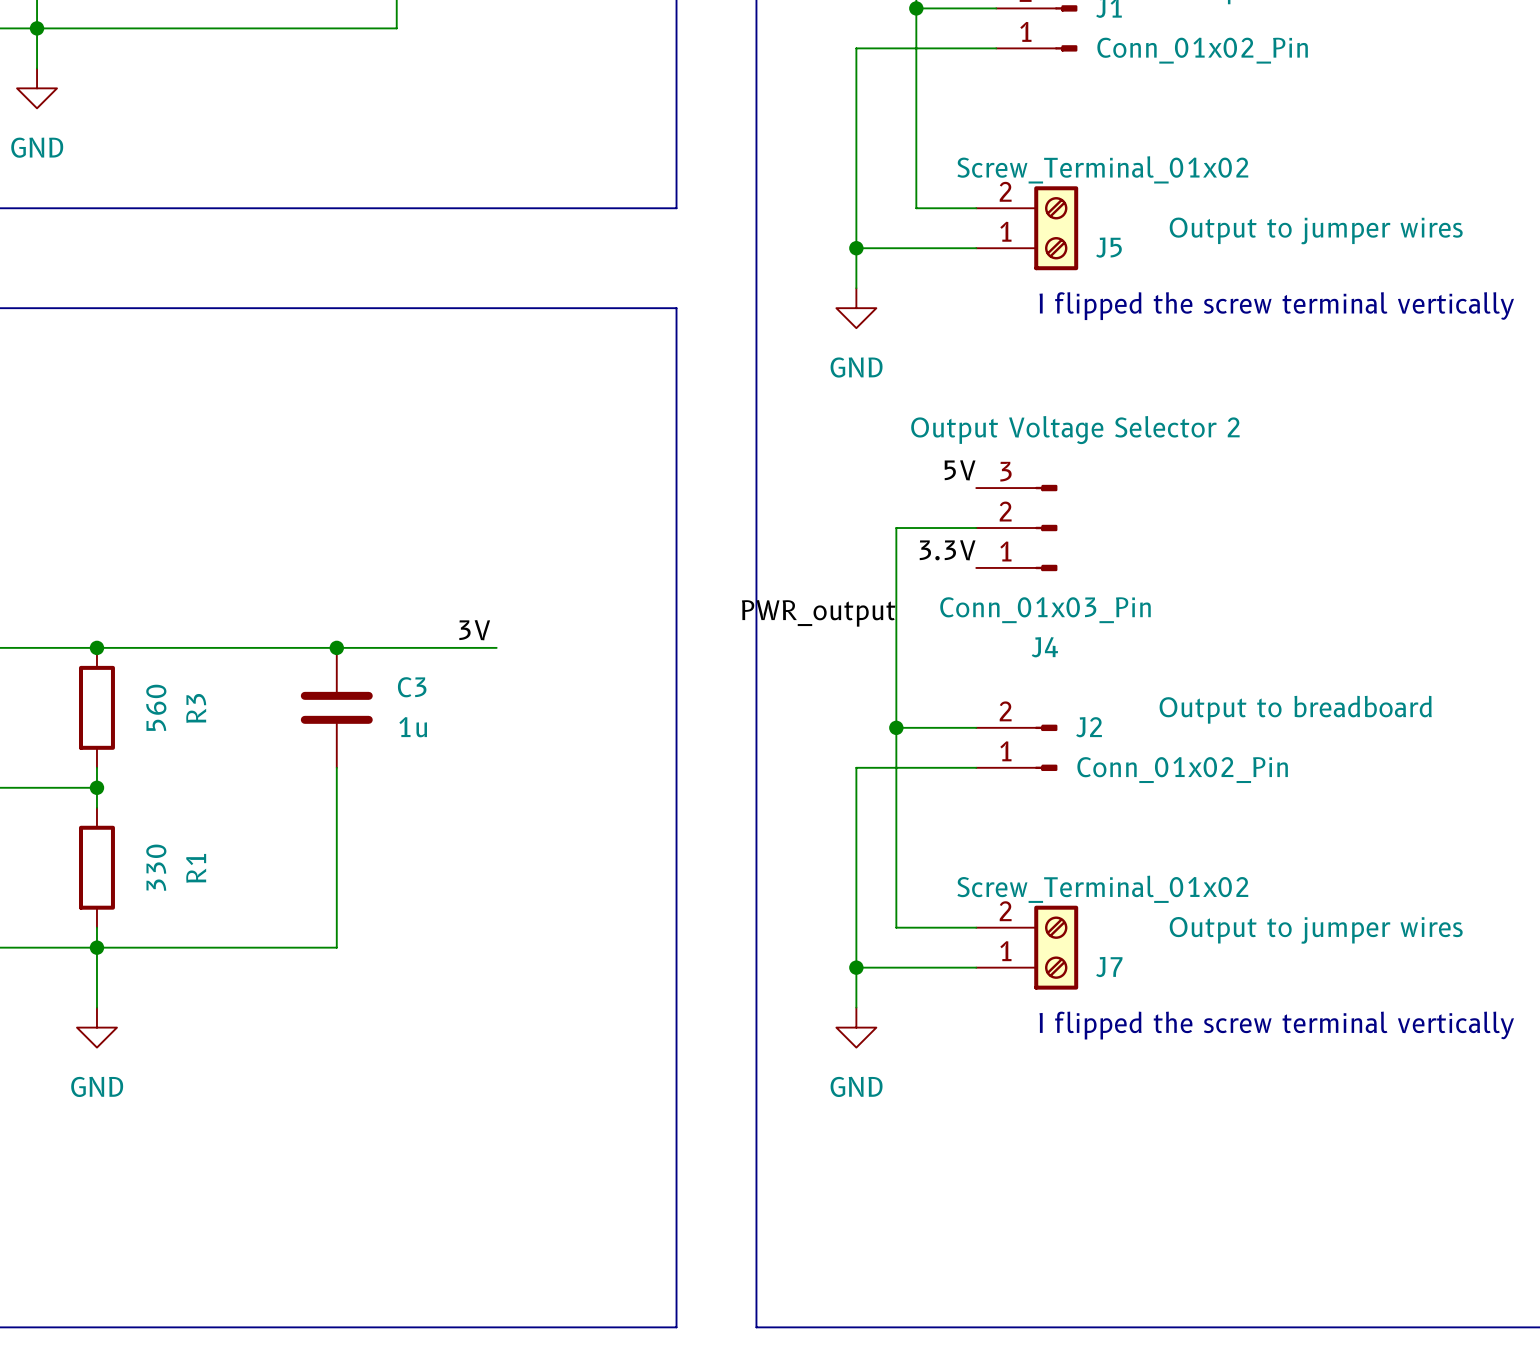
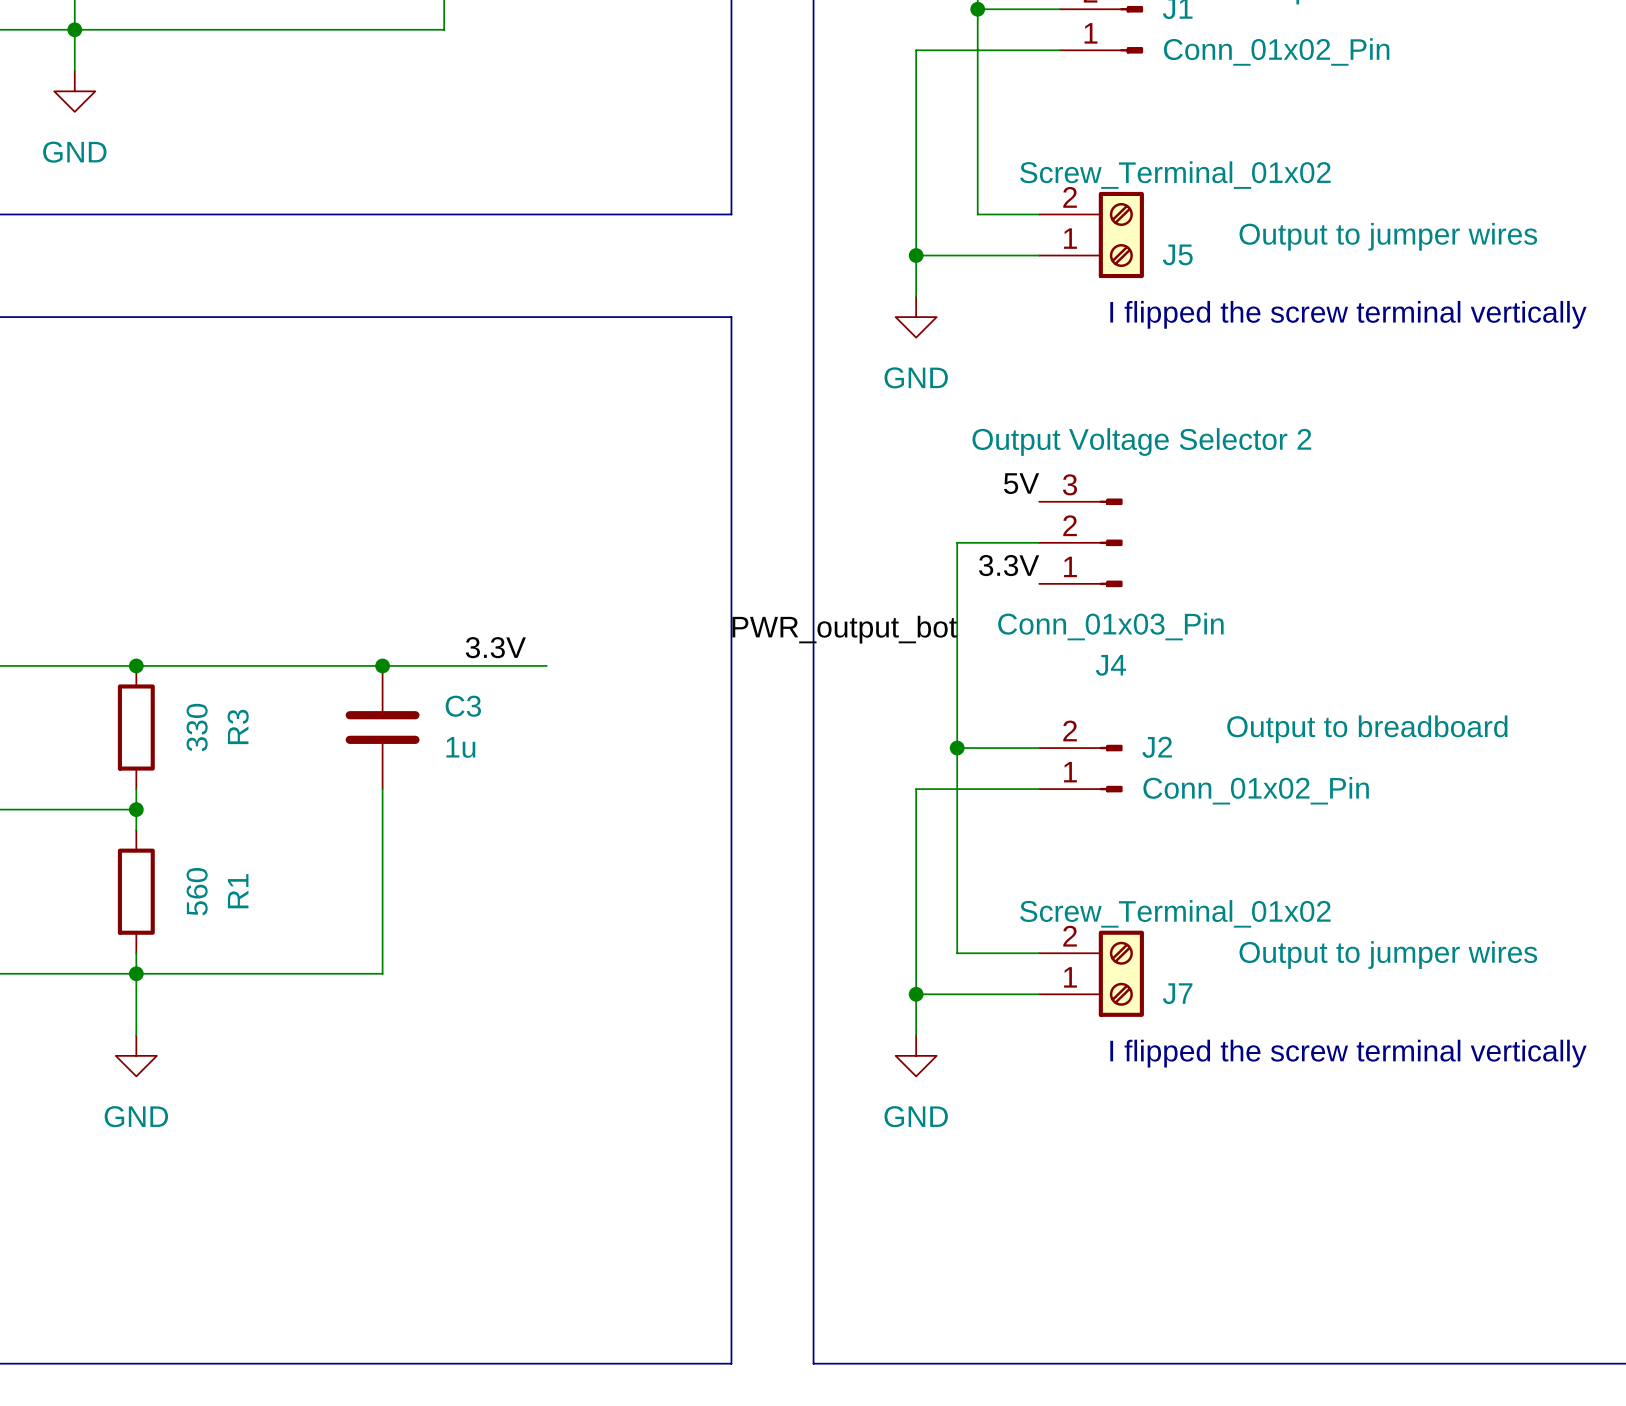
label: PWR_output (818, 613) -> PWR_output_bot (844, 629)
label: 3V (474, 630) -> 3.3V (495, 647)
R3 value: 560 (156, 707) -> 330 (197, 727)
R1 value: 330 (156, 867) -> 560 (197, 891)

